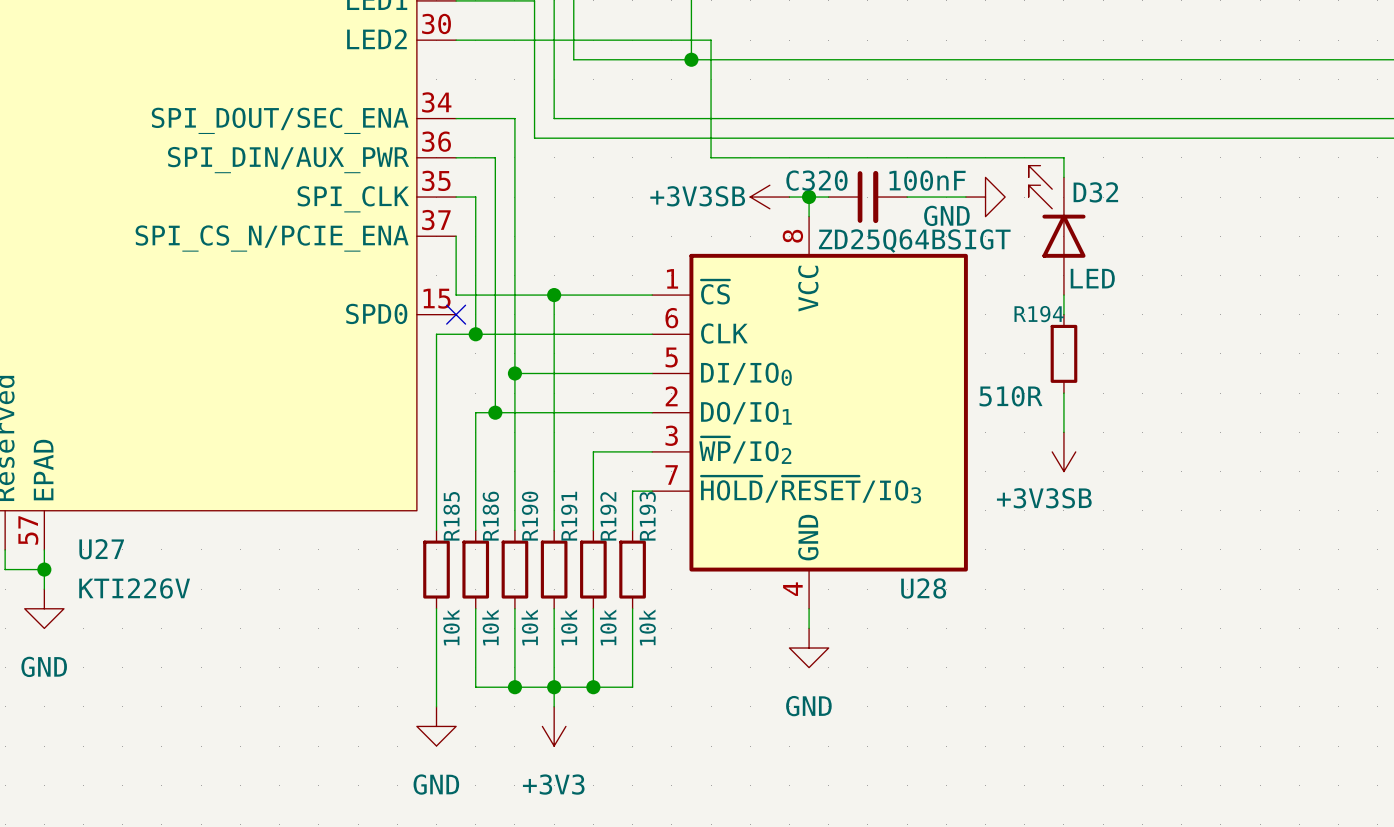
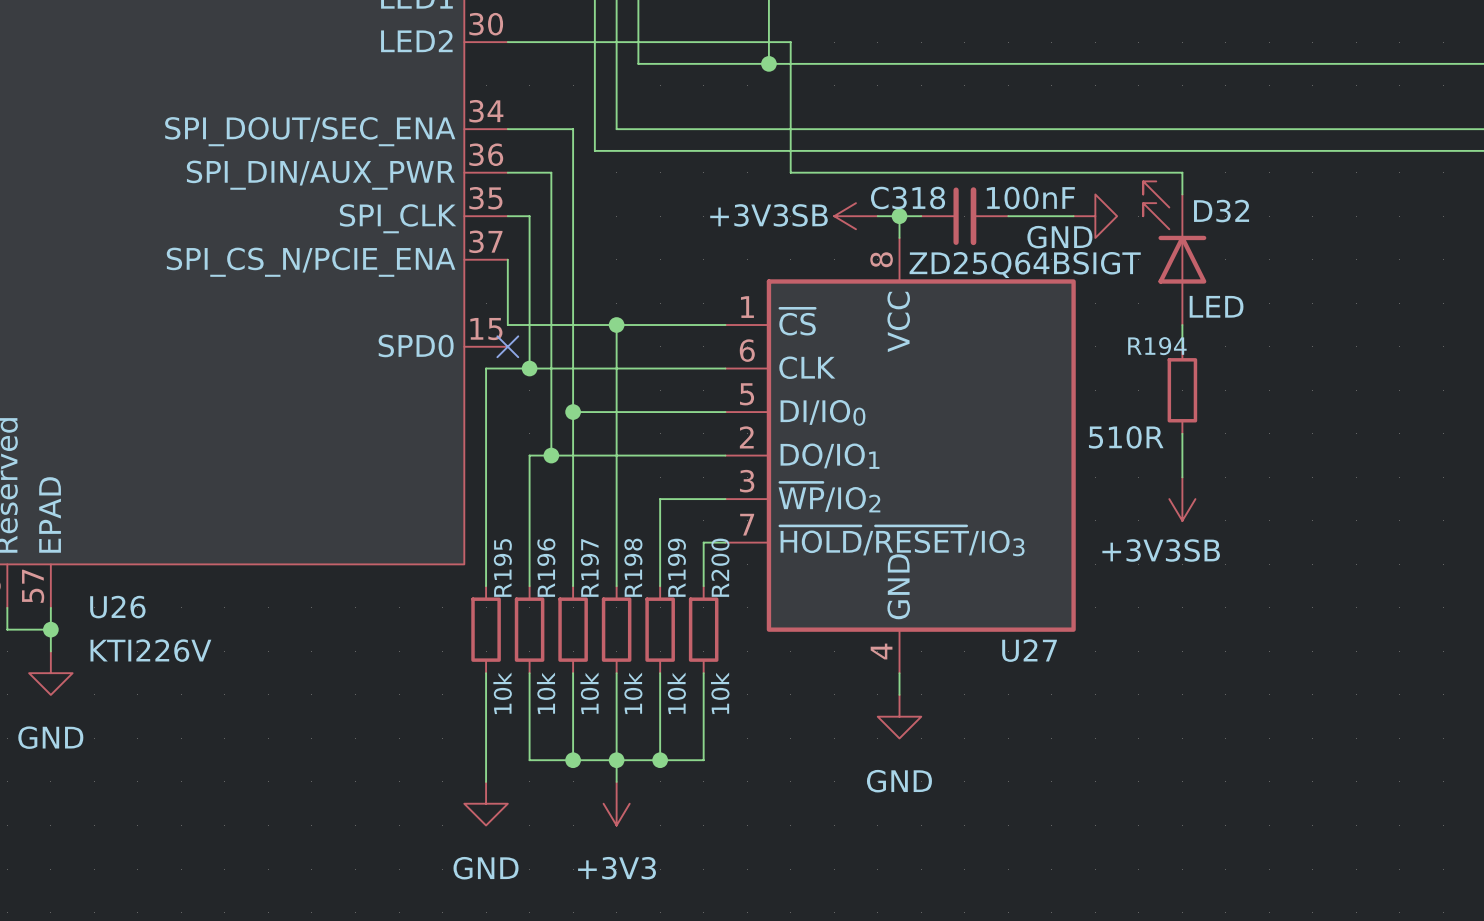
C320 name: C320 (816, 180) -> C318 (908, 198)
R185 name: R185 (451, 516) -> R195 (502, 567)
R186 name: R186 (490, 516) -> R196 (546, 567)
R190 name: R190 (530, 516) -> R197 (589, 567)
R191 name: R191 (569, 516) -> R198 (633, 567)
R192 name: R192 (608, 516) -> R199 (676, 567)
R193 name: R193 (647, 516) -> R200 (720, 567)
U27 name: U27 (101, 549) -> U26 (117, 607)
U28 name: U28 (923, 588) -> U27 (1029, 650)

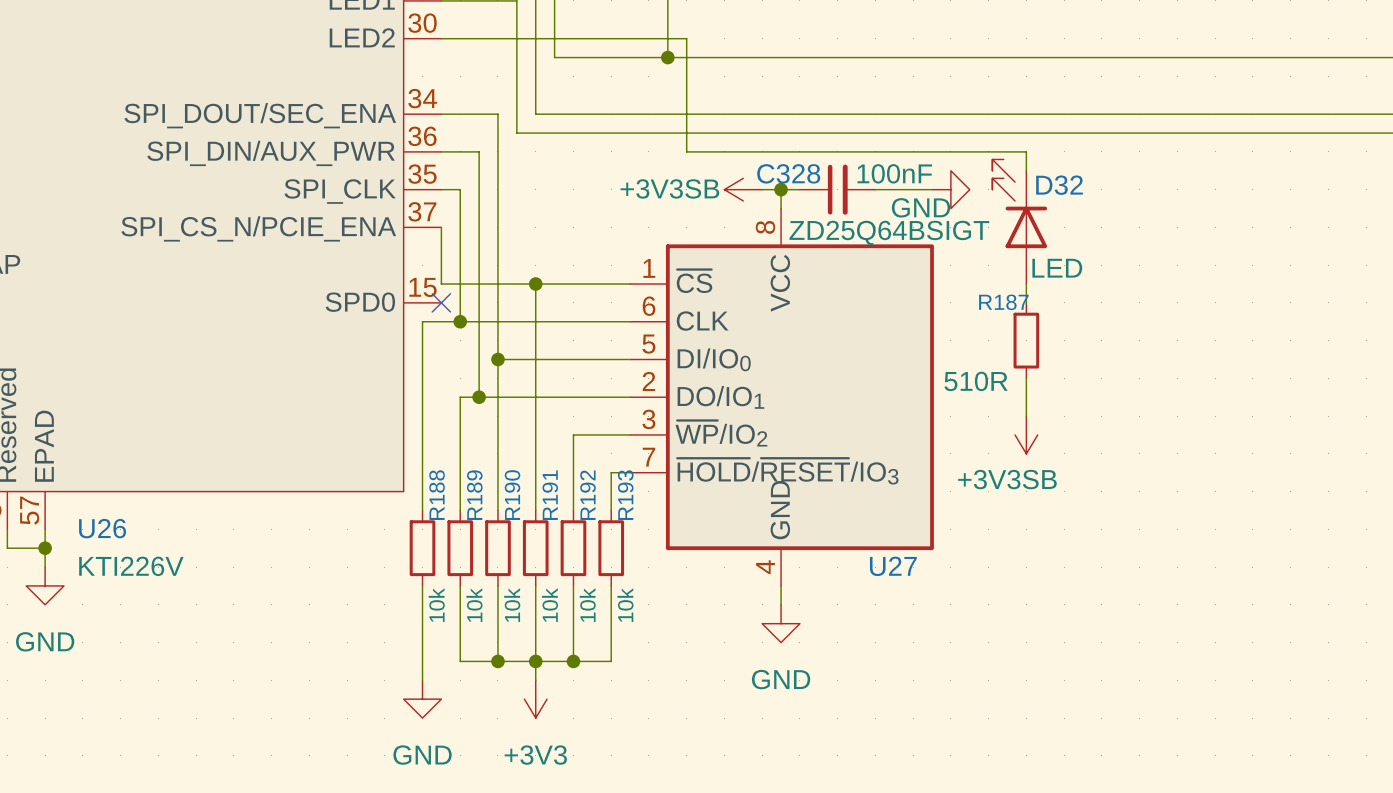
C318 name: C318 (908, 198) -> C328 (788, 173)
R194 name: R194 (1157, 346) -> R187 (1003, 302)
R195 name: R195 (502, 567) -> R188 (437, 495)
R196 name: R196 (546, 567) -> R189 (474, 495)
R197 name: R197 (589, 567) -> R190 (512, 495)
R198 name: R198 (633, 567) -> R191 (550, 495)
R199 name: R199 (676, 567) -> R192 (588, 495)
R200 name: R200 (720, 567) -> R193 (625, 495)

